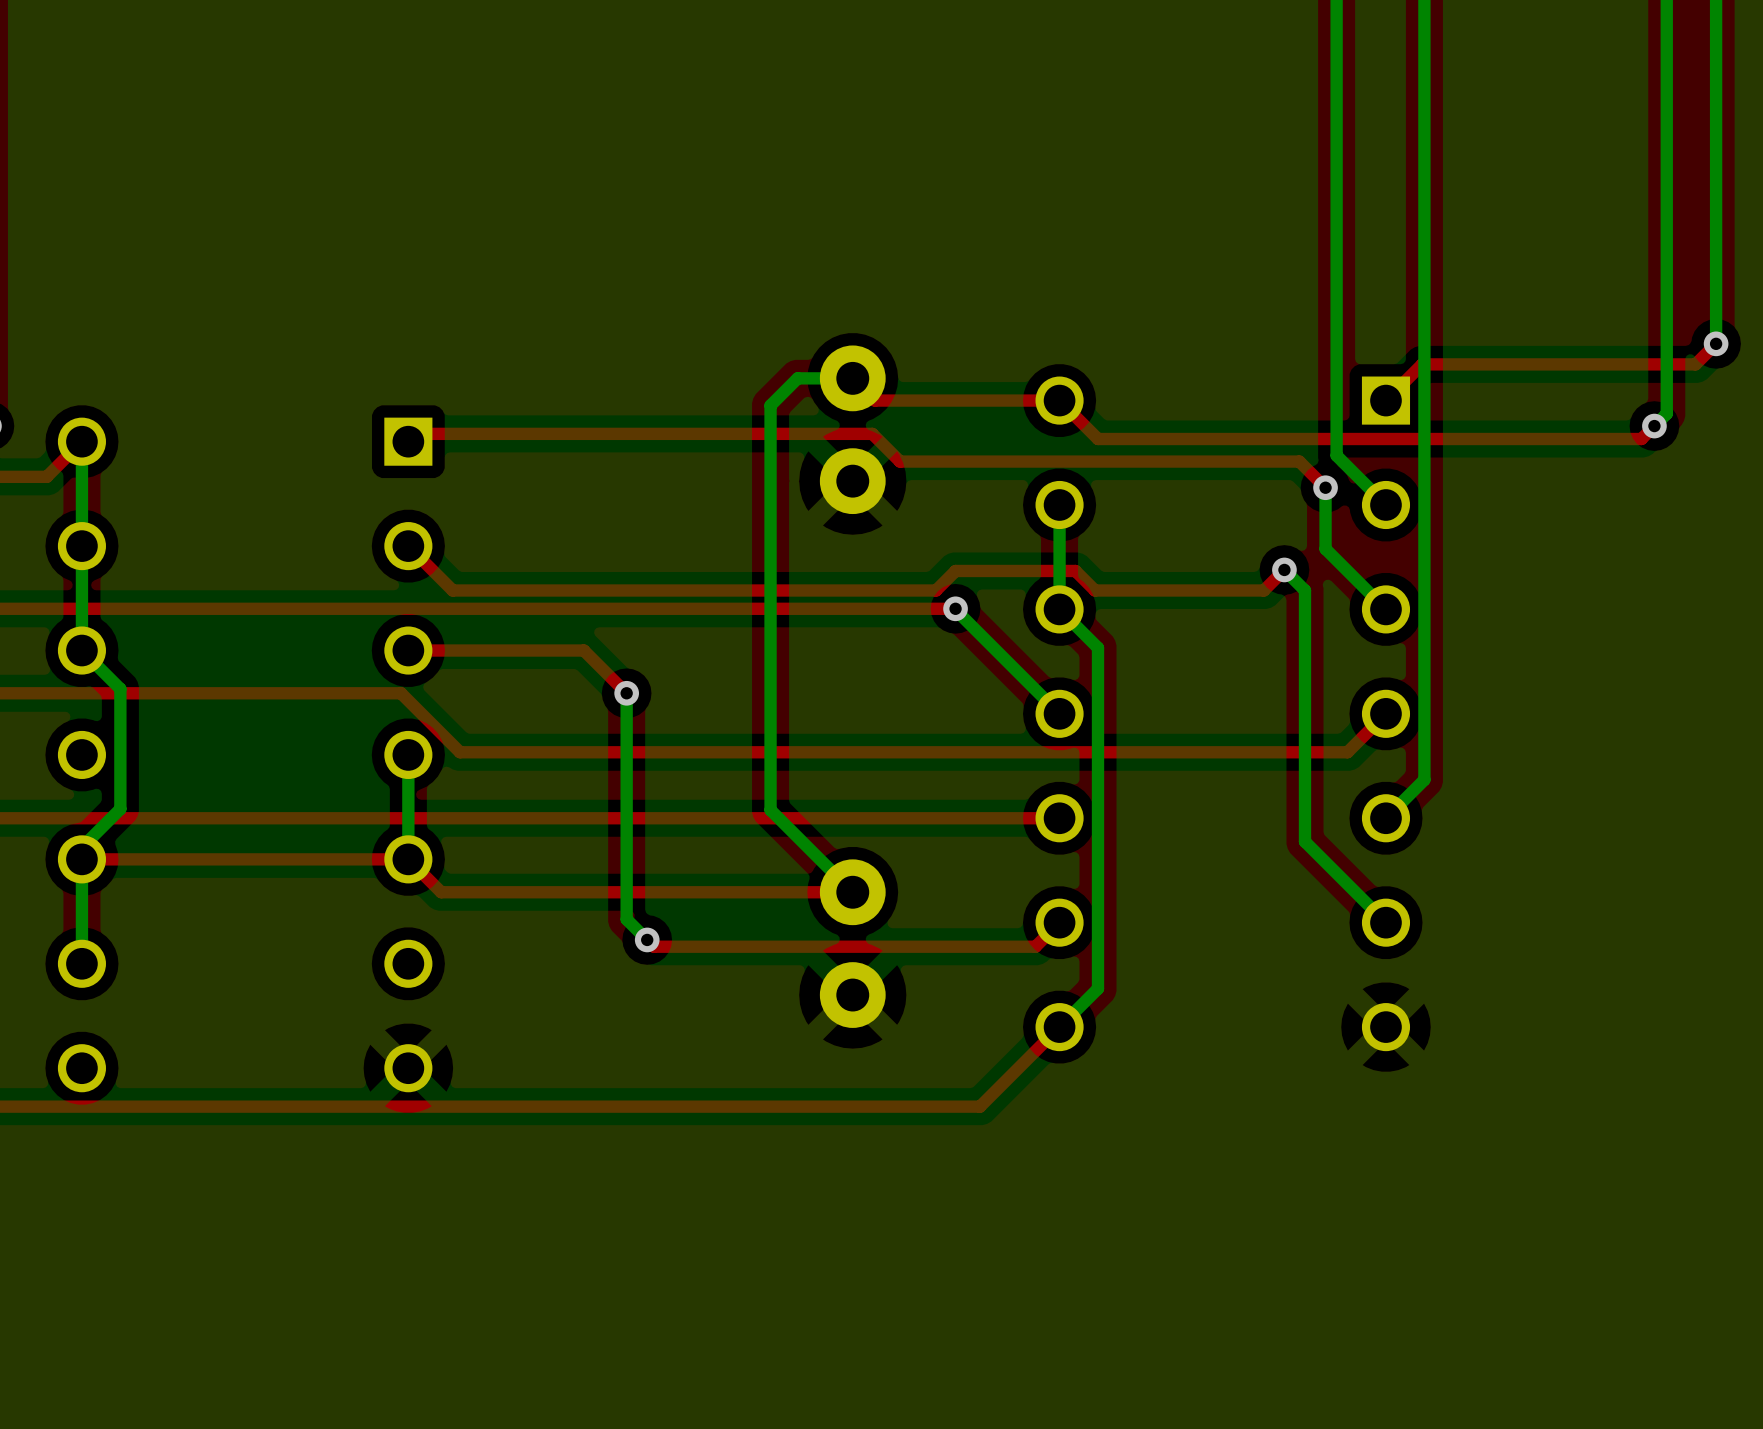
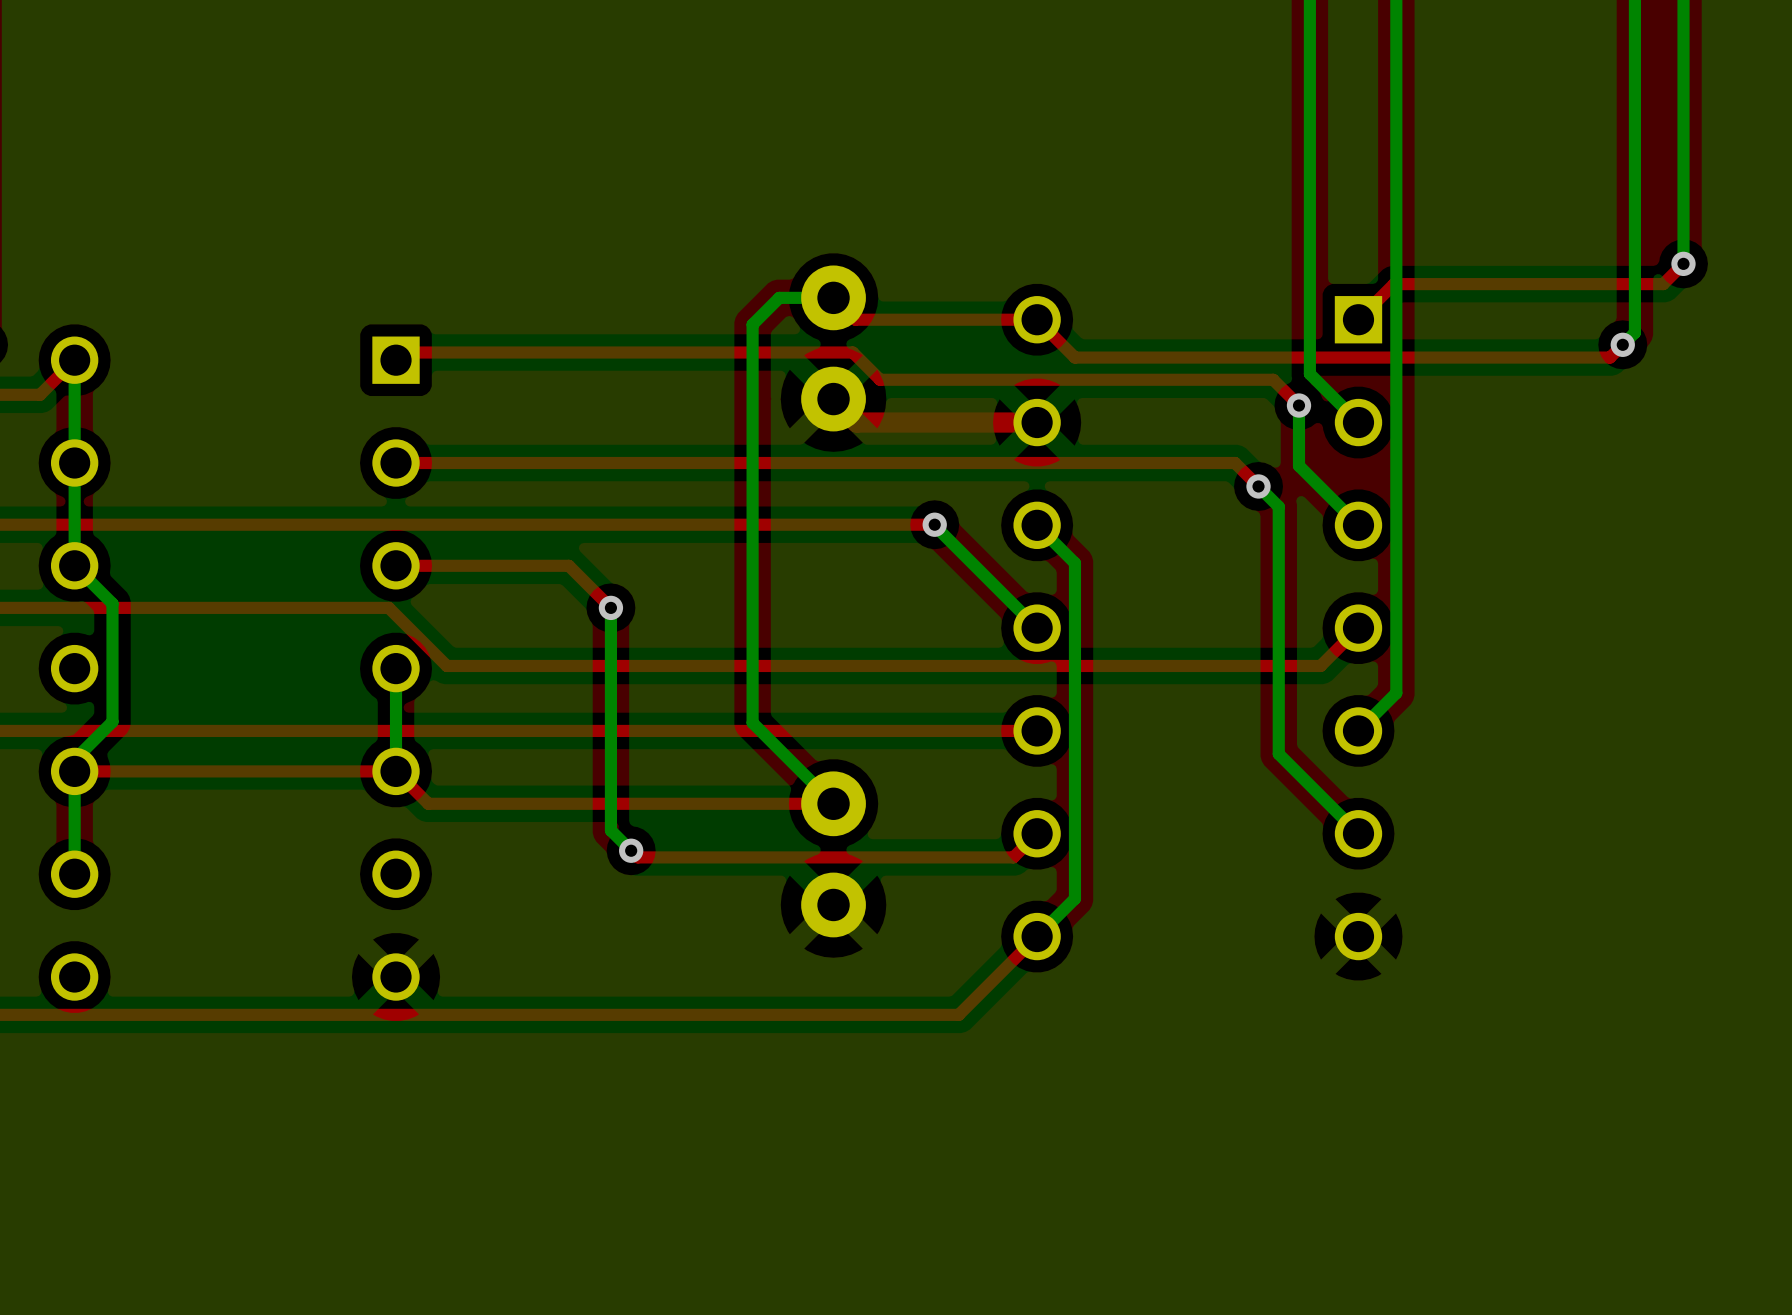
top track: none -> (833, 399) (857, 422) (1037, 422)
bottom track: (1059, 504) (1059, 609) -> none
top track: (408, 546) (452, 590) (936, 590) (955, 570) (1075, 570) (1095, 590) (1263, 590) (1284, 569) -> (396, 463) (1235, 463) (1258, 486)

